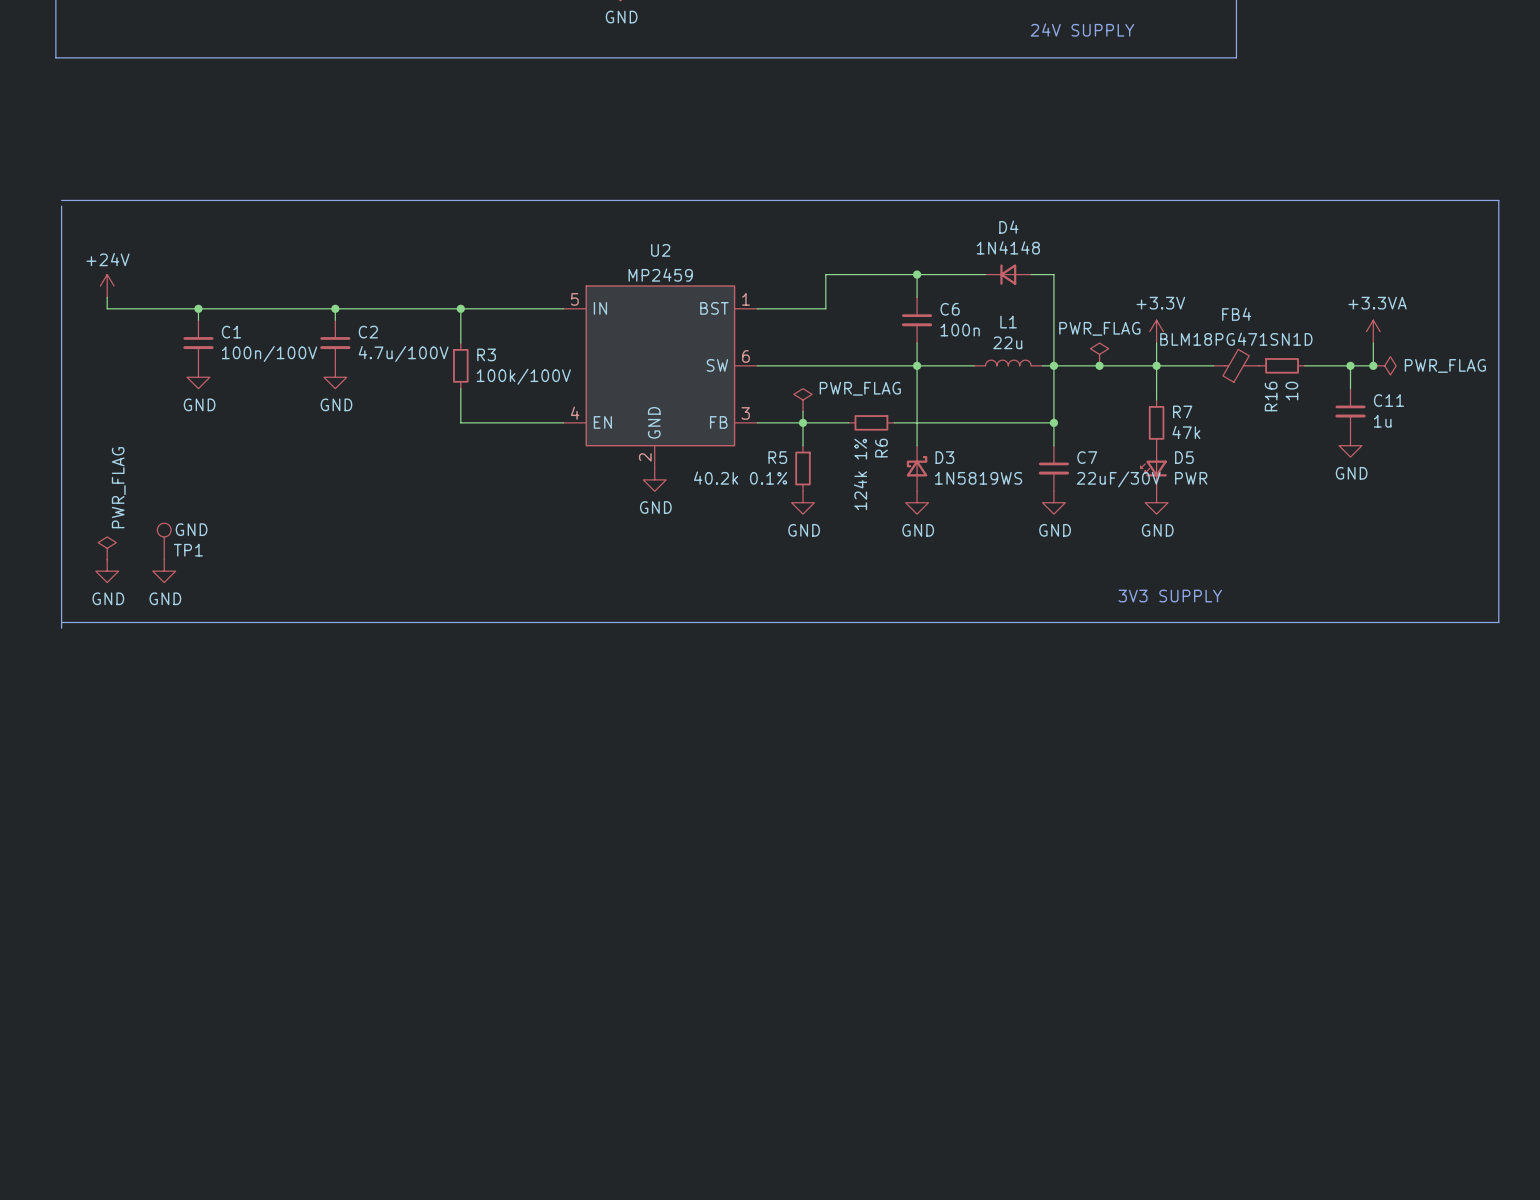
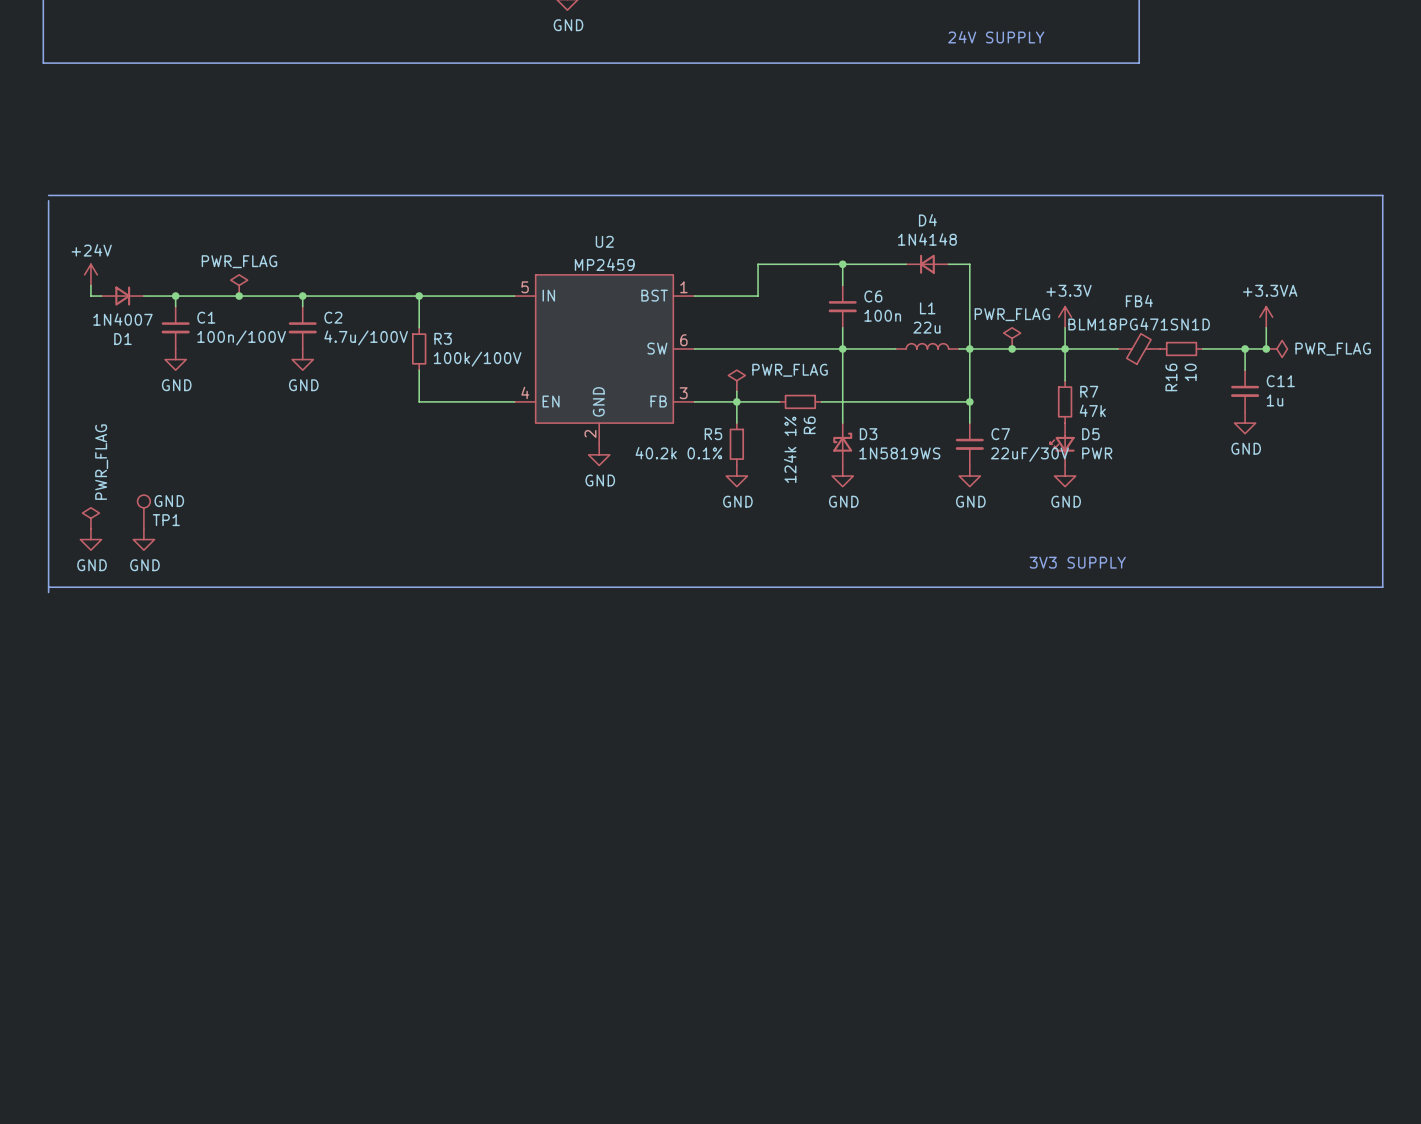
power symbol: none -> PWR_FLAG (239, 285)
D1: none -> 1N4007 (122, 296)
junction: none -> (239, 296)

